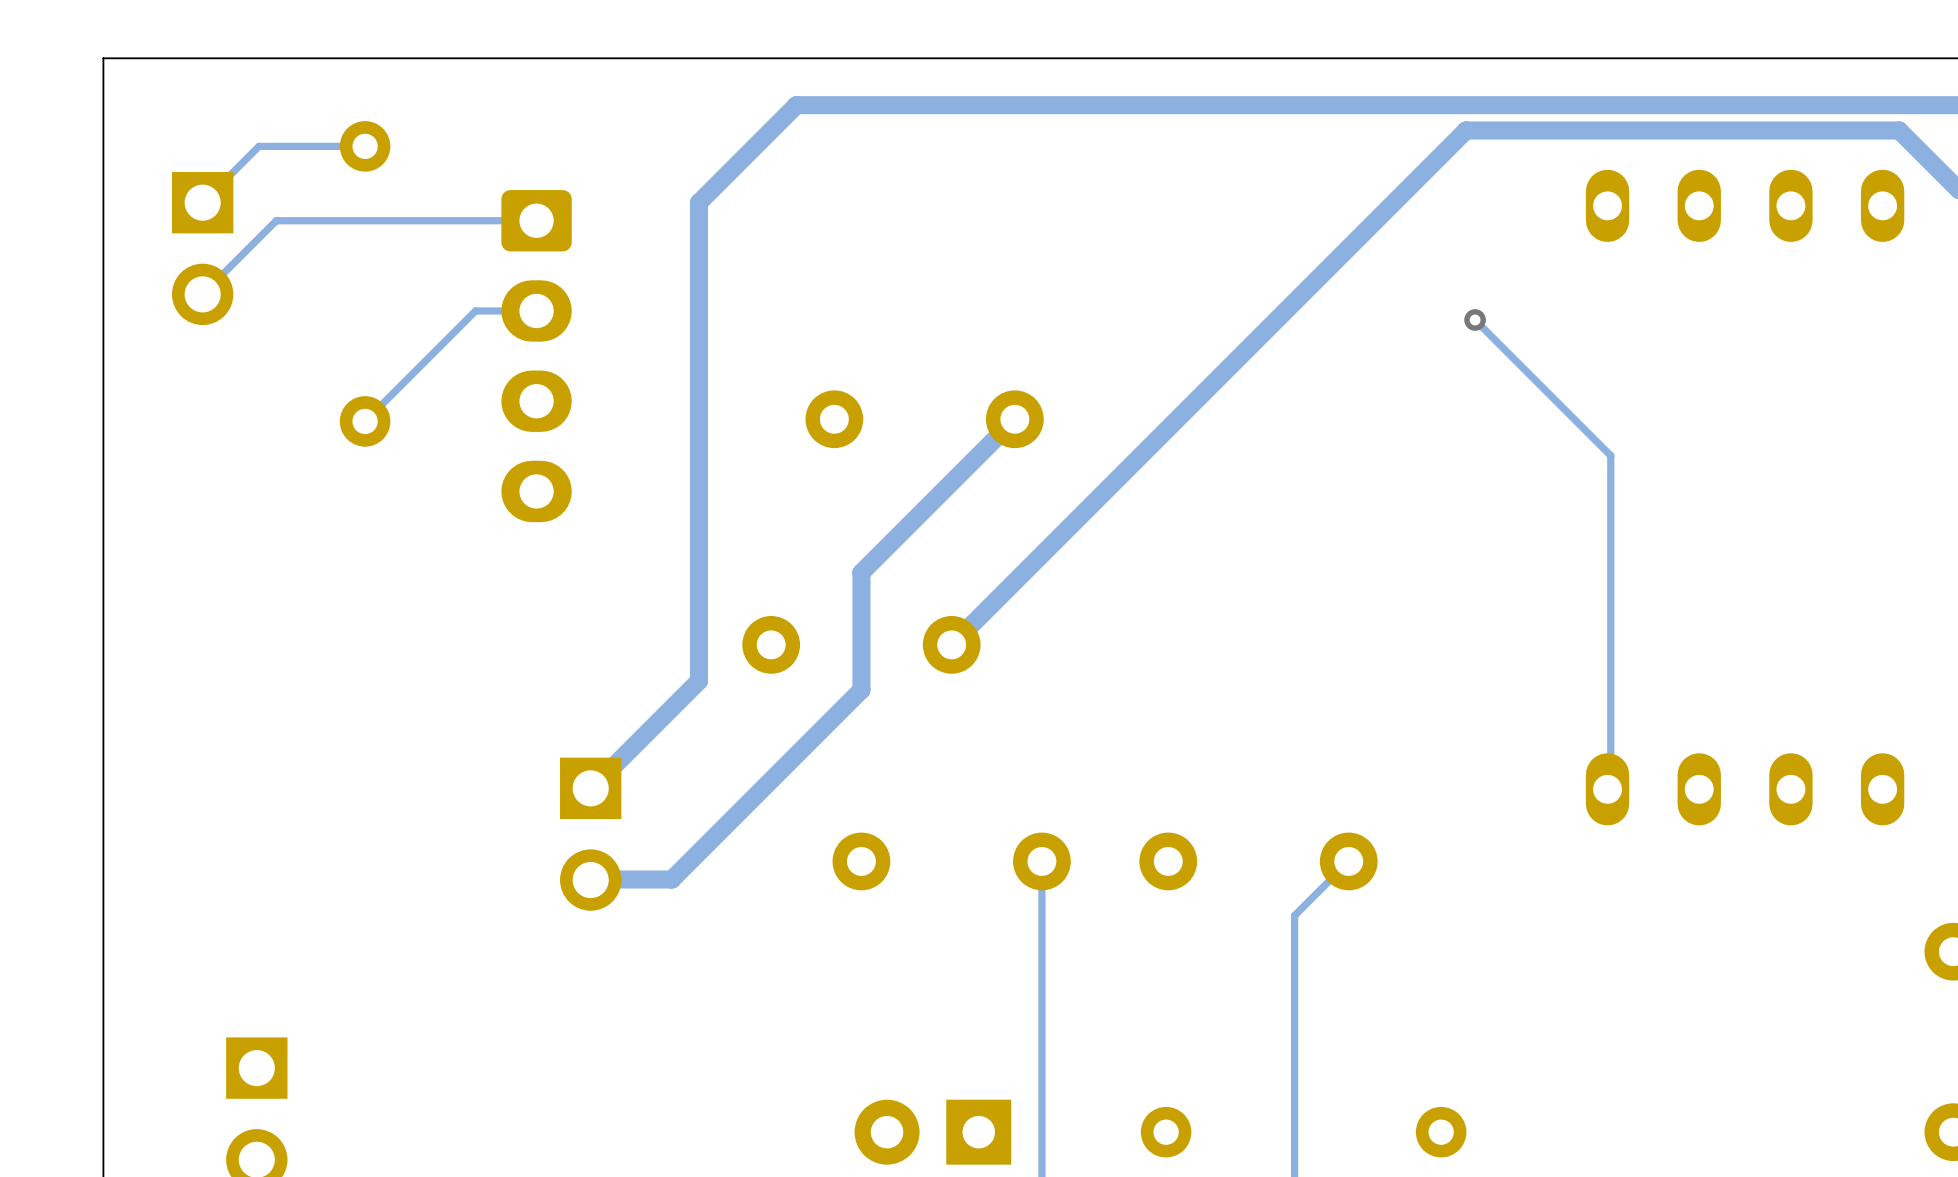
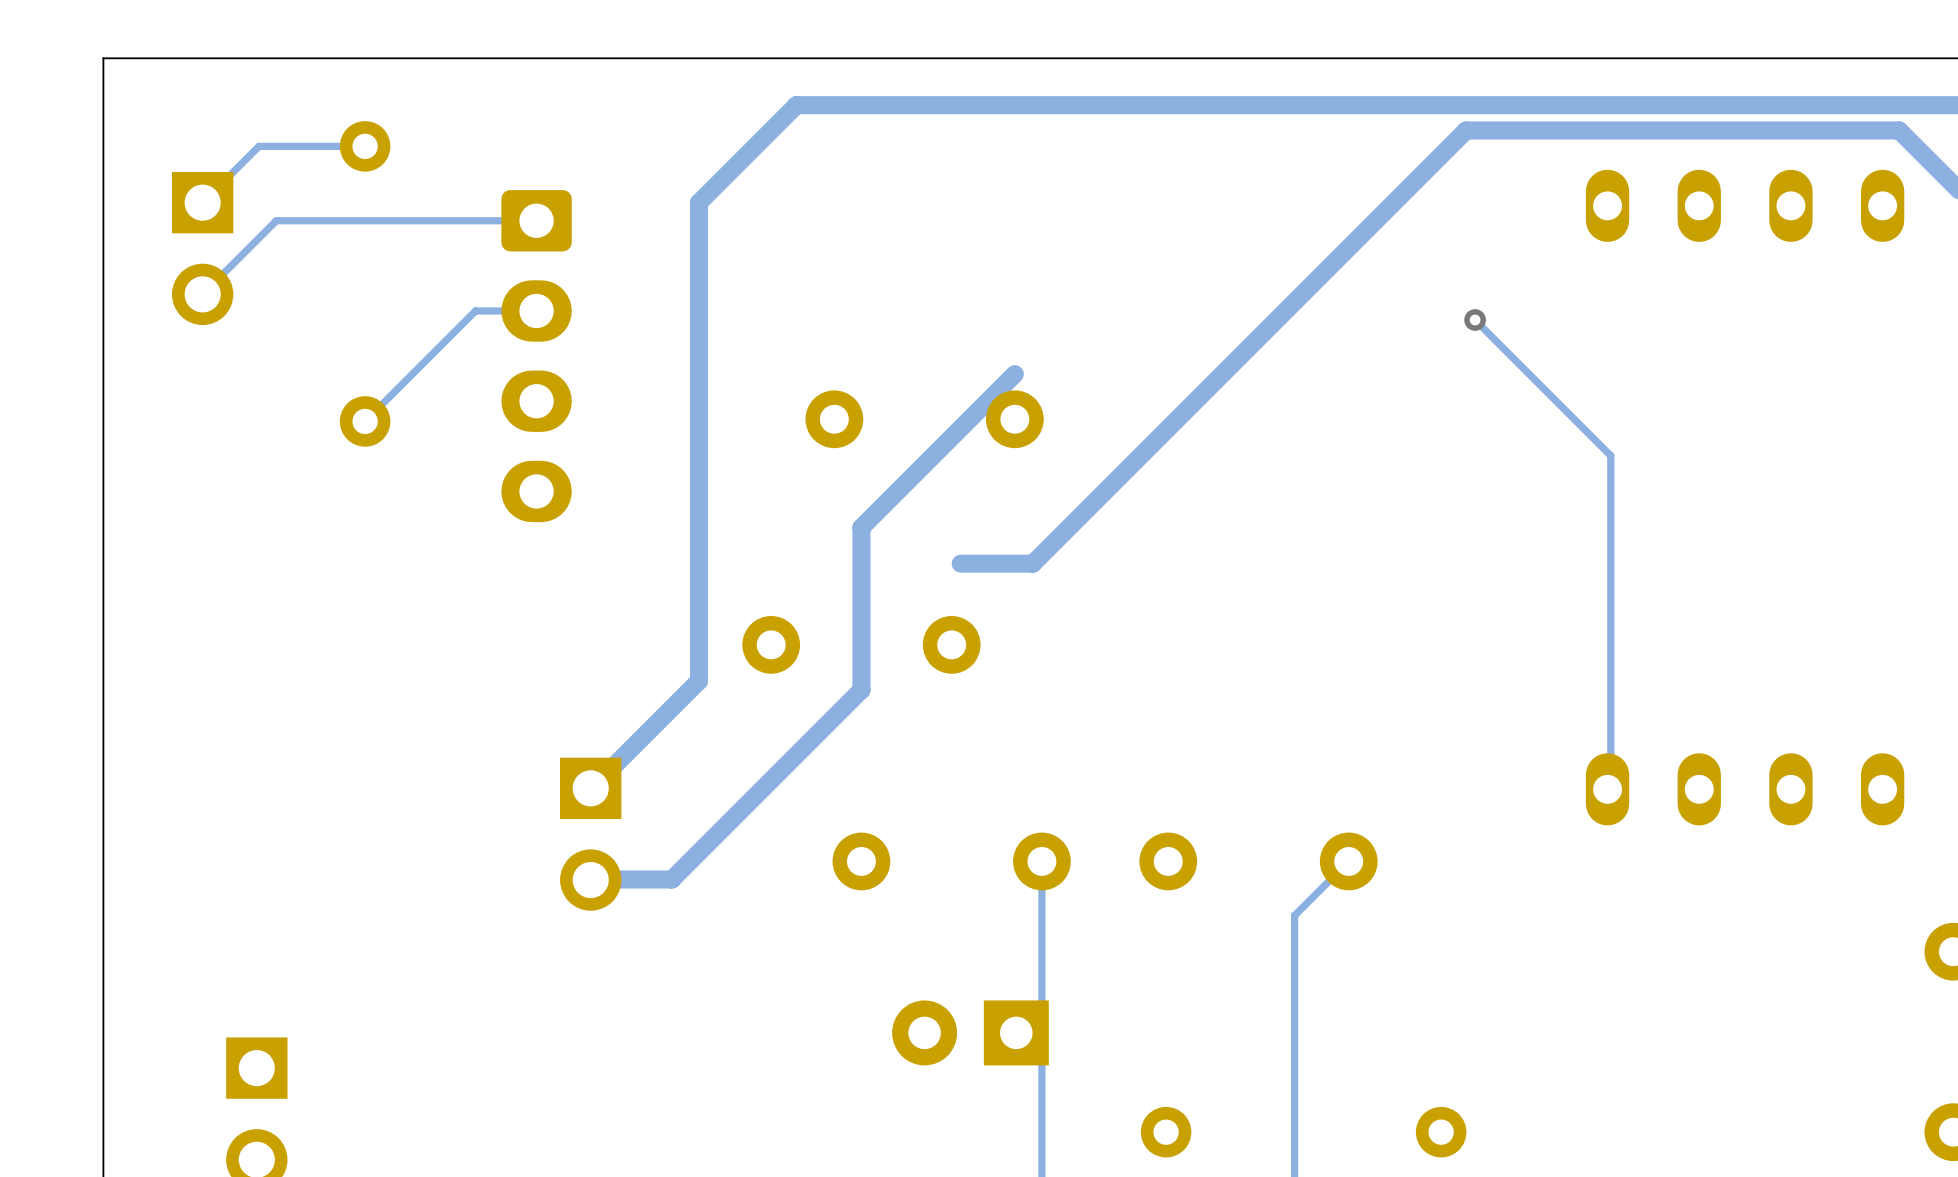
track: (1014, 419) (861, 572) -> (1014, 374) (861, 527) (861, 572)
track: (1032, 563) (951, 644) -> (1032, 563) (960, 563)
part position: (932, 1132) -> (970, 1032)

